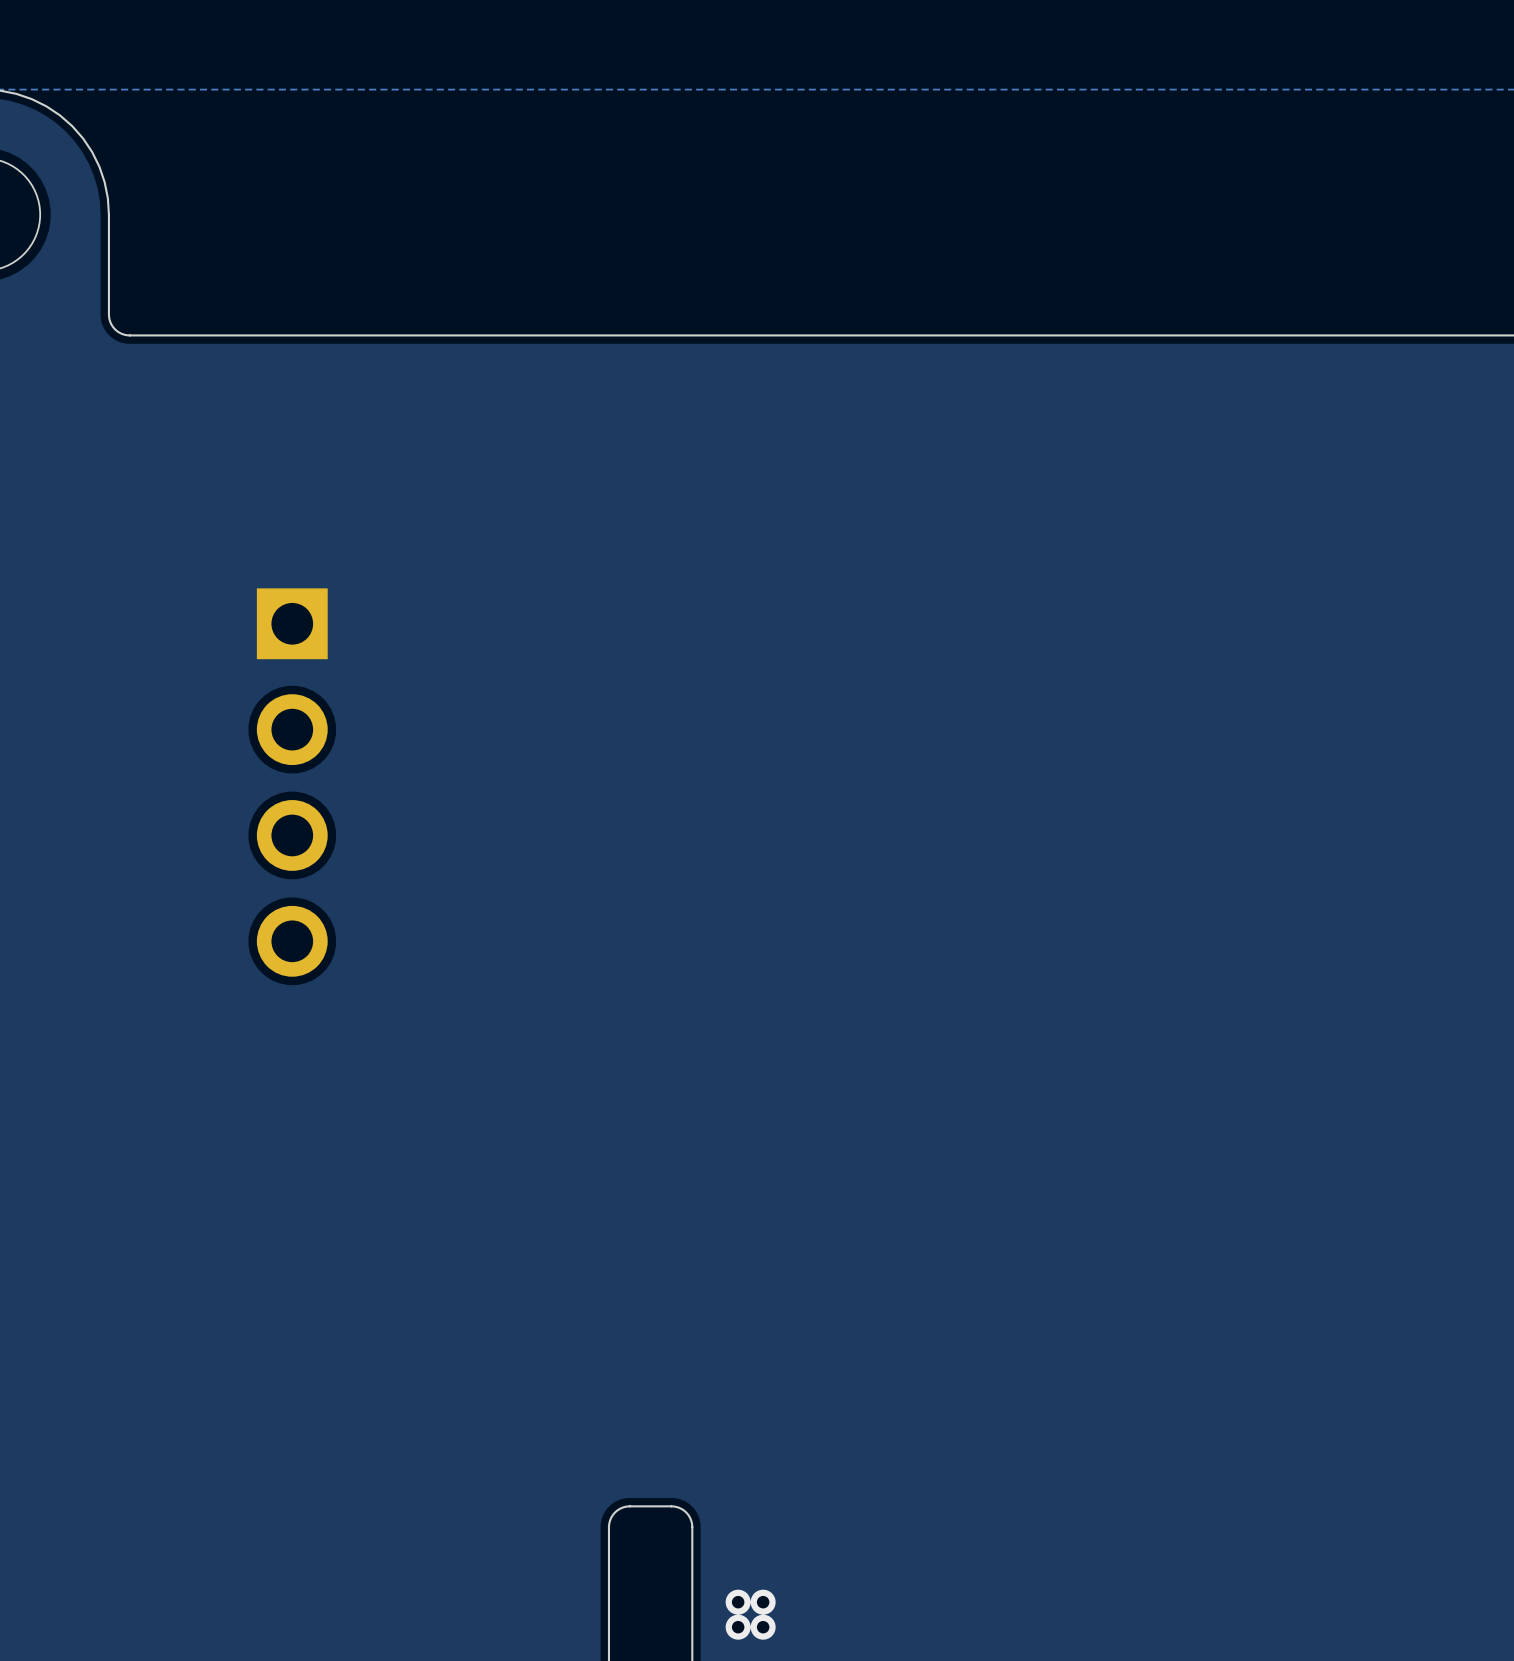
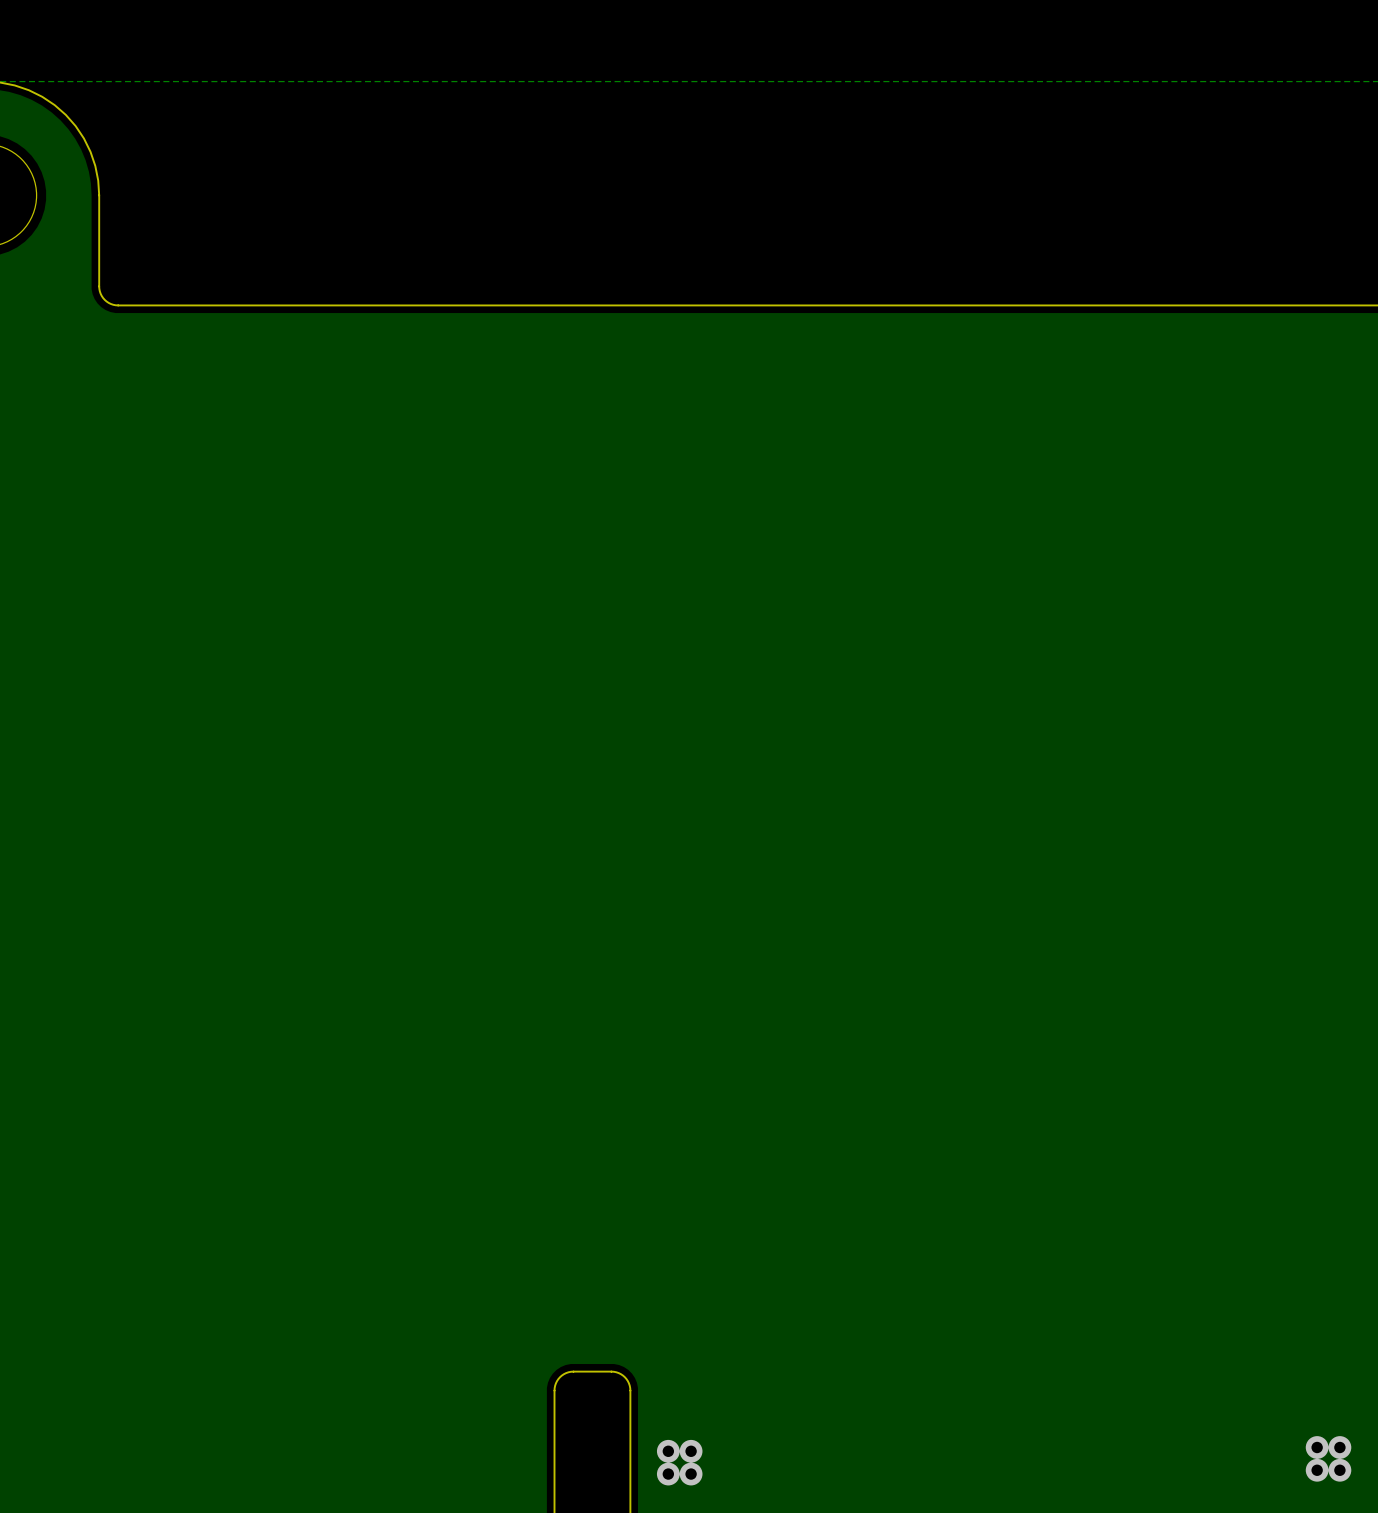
part: (292, 782) -> none
via: none -> (1317, 1447)
via: none -> (1339, 1447)
via: none -> (668, 1451)
via: none -> (691, 1451)
via: (738, 1602) -> none
via: (763, 1602) -> none
via: none -> (1317, 1470)
via: none -> (1339, 1470)
via: none -> (668, 1474)
via: none -> (691, 1474)
via: (738, 1627) -> none
via: (763, 1627) -> none

